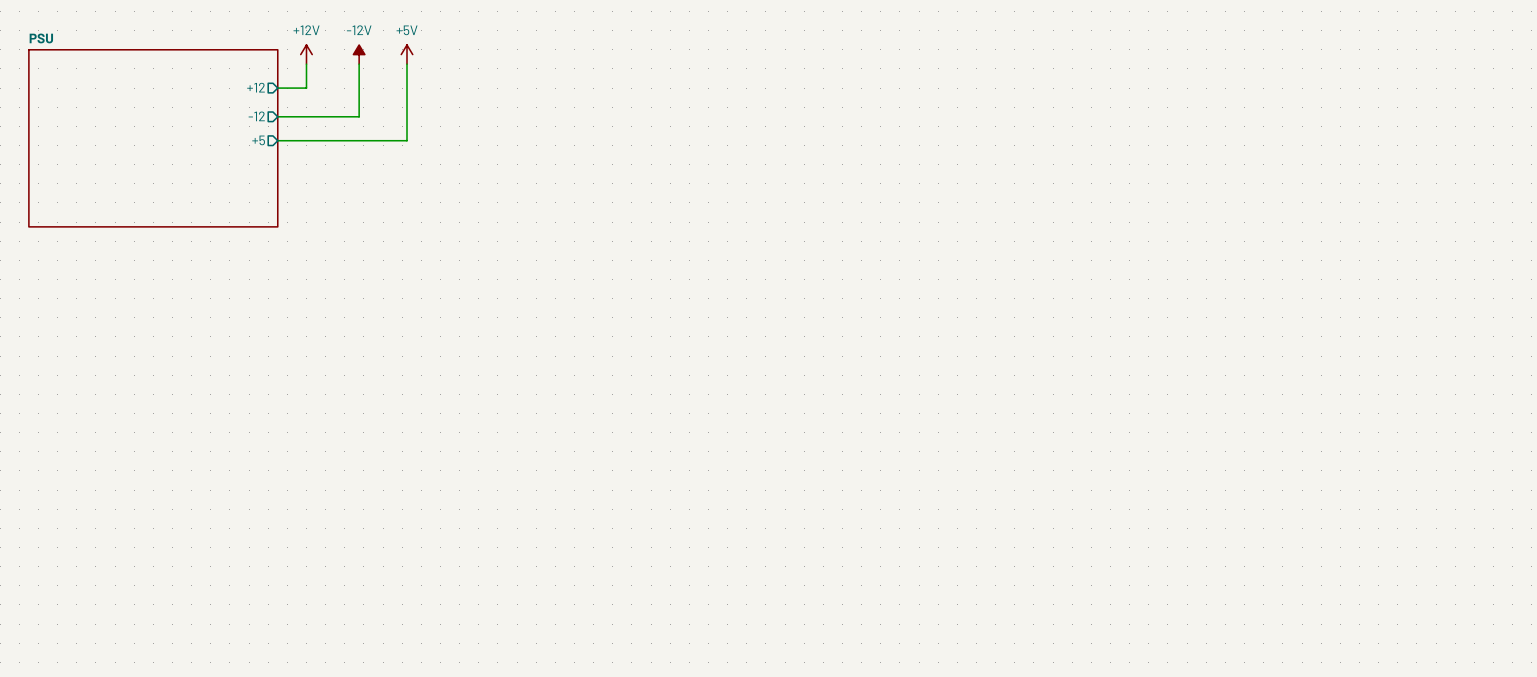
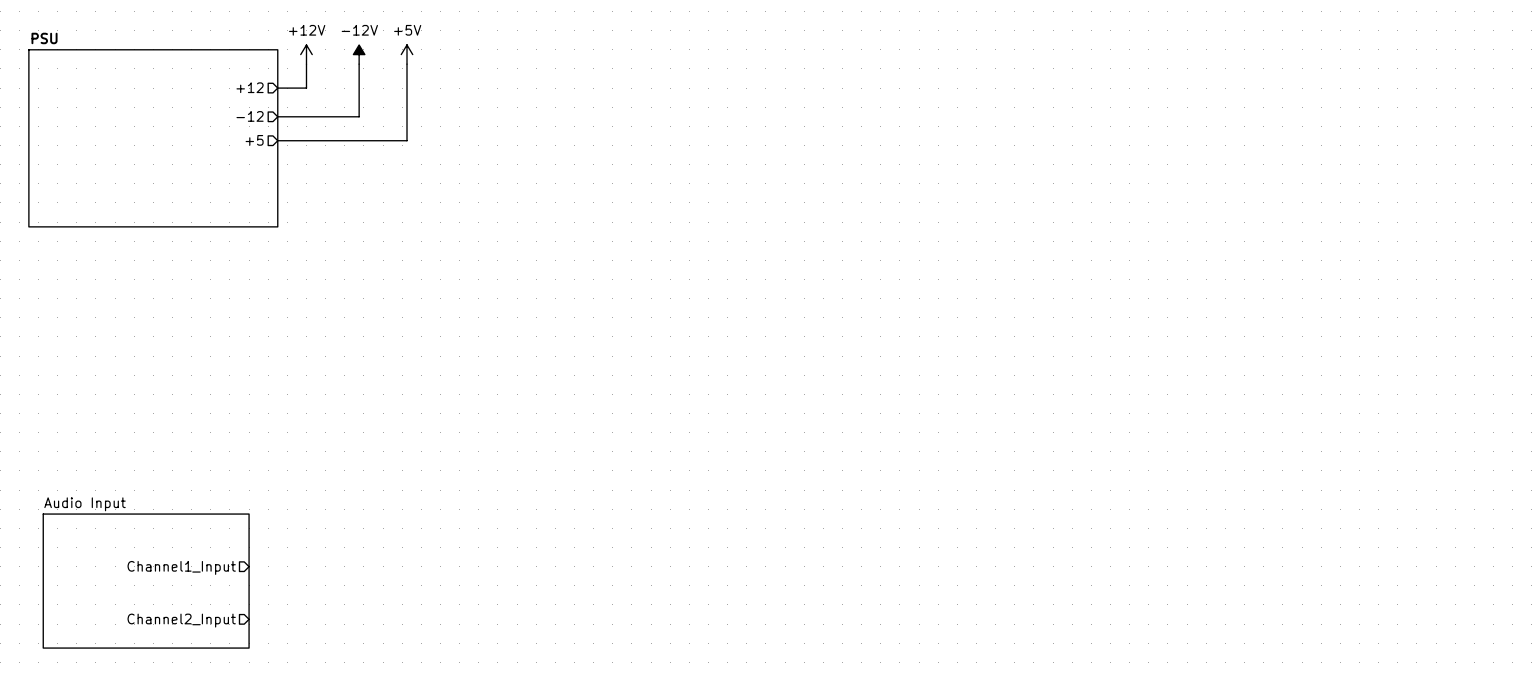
sheet pin: none -> Channel1_Input (181, 567)
sheet Audio Input: none -> (146, 581)
sheet pin: none -> Channel2_Input (181, 620)

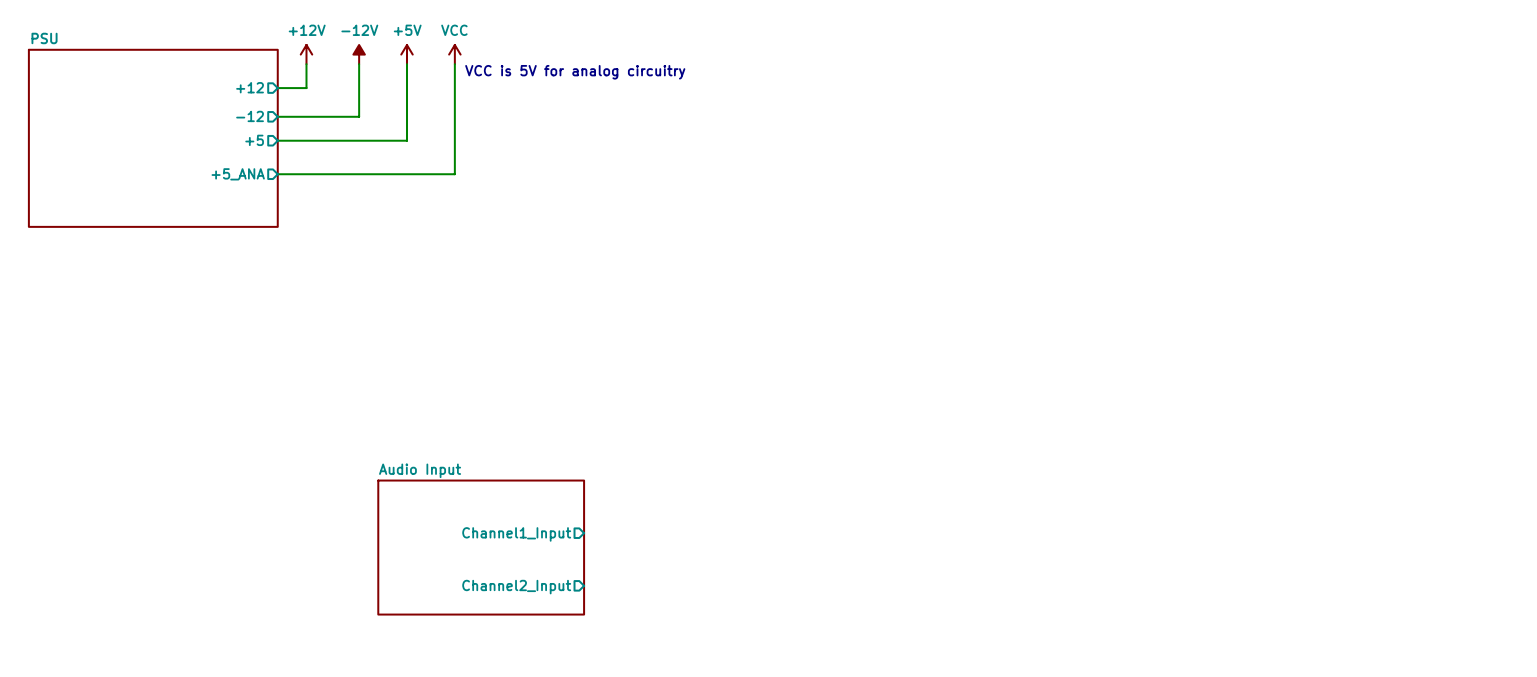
power symbol: none -> VCC (454, 54)
wire: none -> (454, 64) (454, 174) (277, 174)
text: none -> VCC is 5V for analog circuitry (575, 72)
sheet pin: none -> +5_ANA (238, 174)
sheet pin: none -> Channel1_Input (516, 534)
sheet Audio Input: none -> (481, 547)
sheet pin: Channel1_Input (181, 567) -> none
sheet Audio Input: (146, 581) -> none
sheet pin: none -> Channel2_Input (516, 587)
sheet pin: Channel2_Input (181, 620) -> none

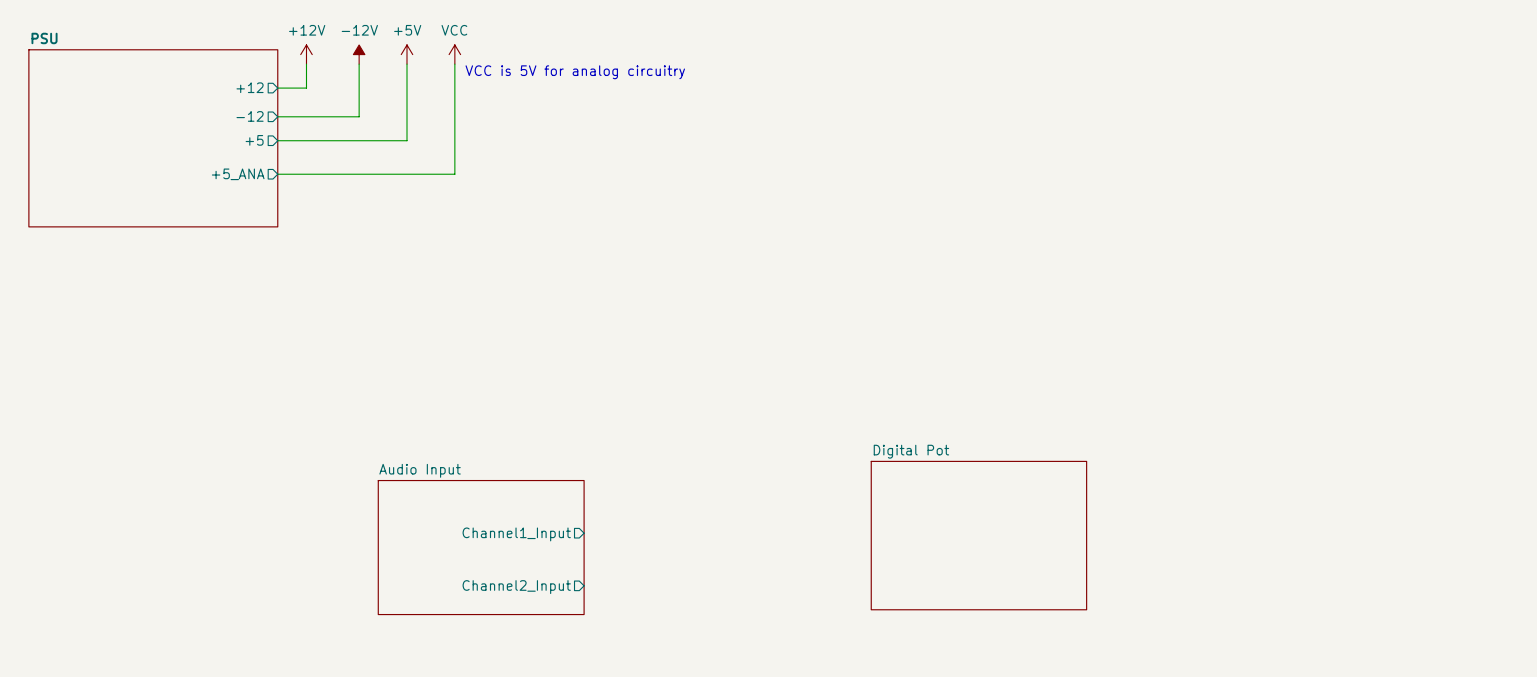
sheet Digital Pot: none -> (978, 535)

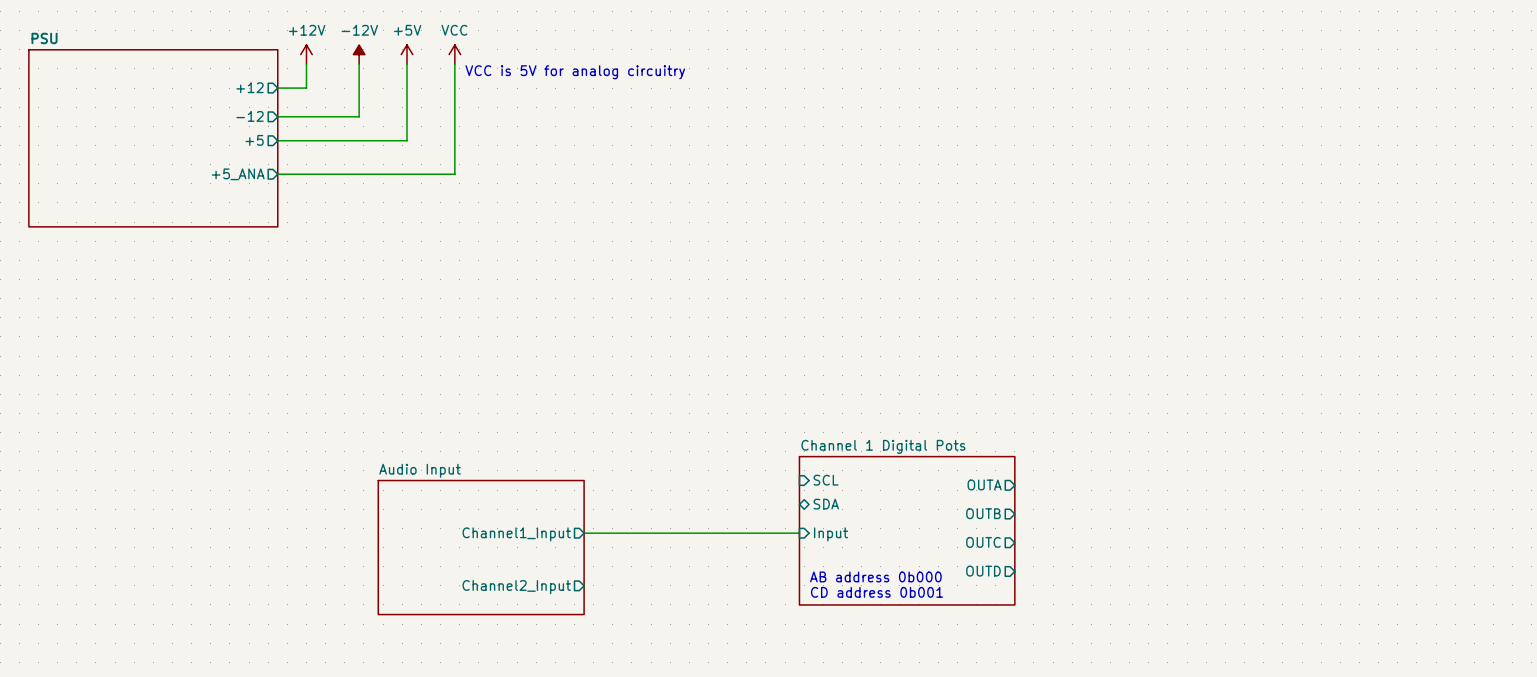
sheet pin: none -> SCL (826, 480)
sheet pin: none -> OUTA (984, 484)
sheet pin: none -> SDA (826, 504)
sheet pin: none -> OUTB (983, 513)
sheet Channel 1 Digital Pots: none -> (907, 530)
wire: none -> (584, 533) (799, 533)
sheet pin: none -> Input (831, 534)
sheet Digital Pot: (978, 535) -> none
sheet pin: none -> OUTC (983, 542)
sheet pin: none -> OUTD (983, 571)
text: none -> AB address 0b000 (875, 576)
text: none -> CD address 0b001 (877, 592)

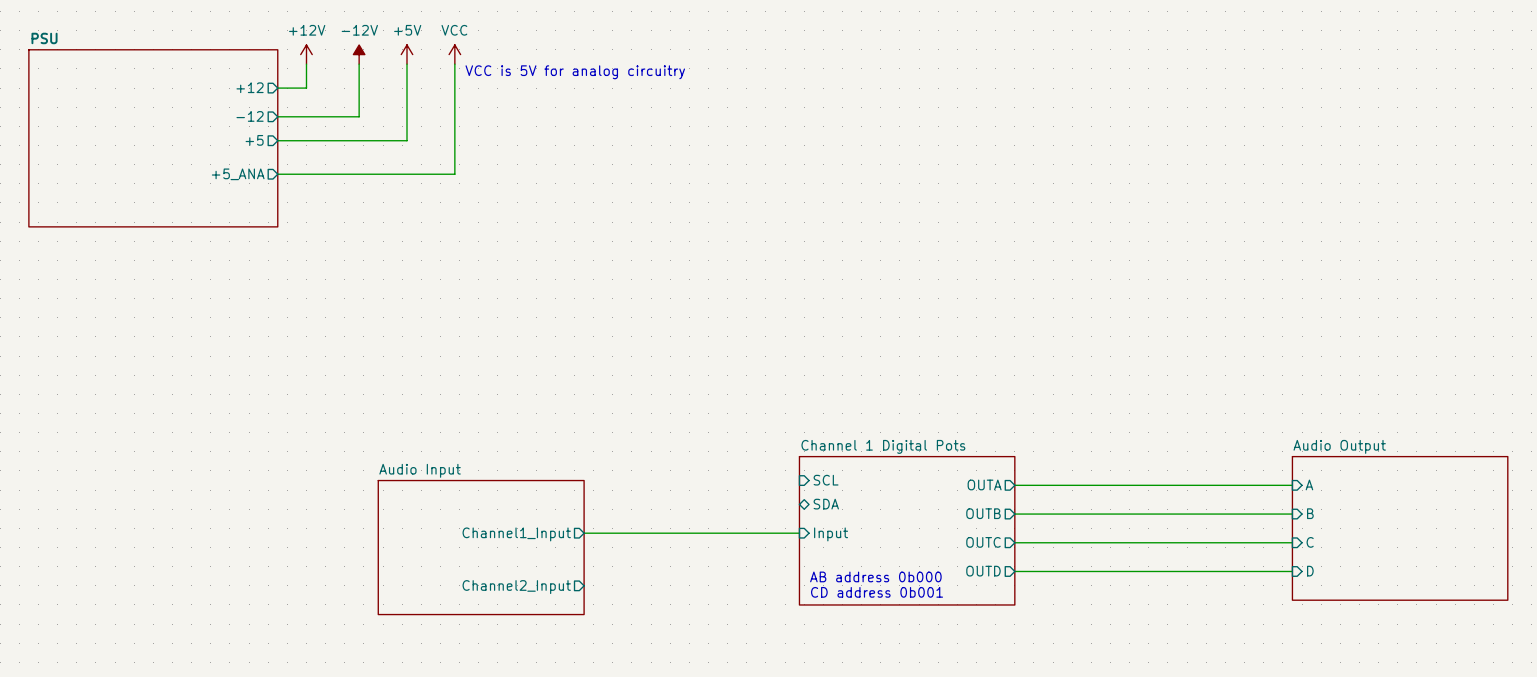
sheet pin: none -> A (1309, 484)
wire: none -> (1014, 485) (1292, 485)
sheet pin: none -> B (1310, 513)
wire: none -> (1014, 514) (1292, 514)
sheet Audio Output: none -> (1400, 528)
wire: none -> (1014, 542) (1292, 542)
sheet pin: none -> C (1310, 542)
wire: none -> (1014, 571) (1292, 571)
sheet pin: none -> D (1310, 571)

